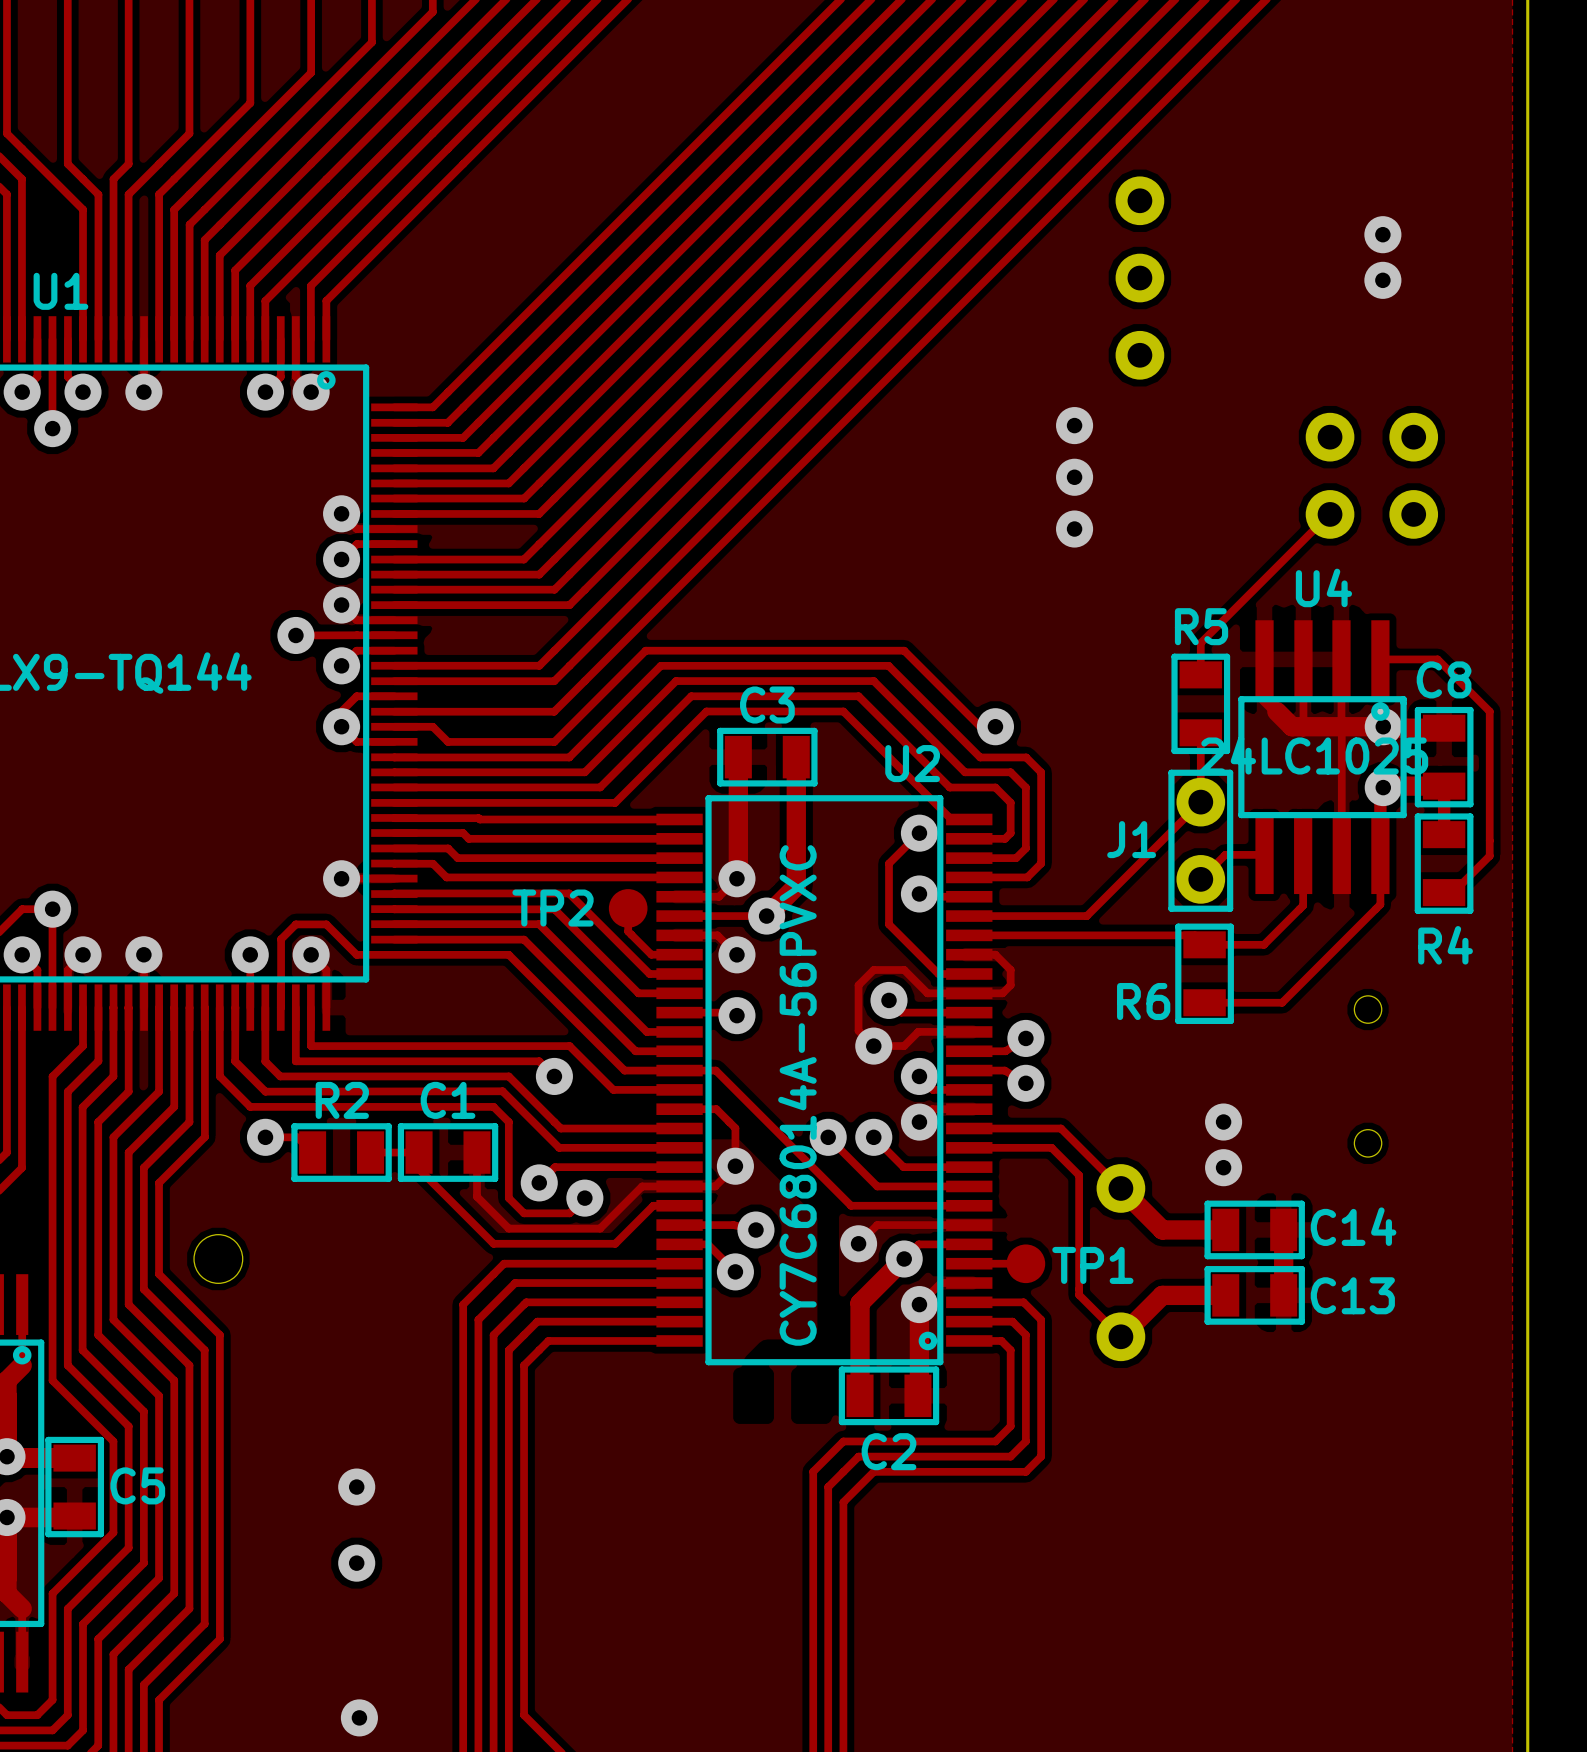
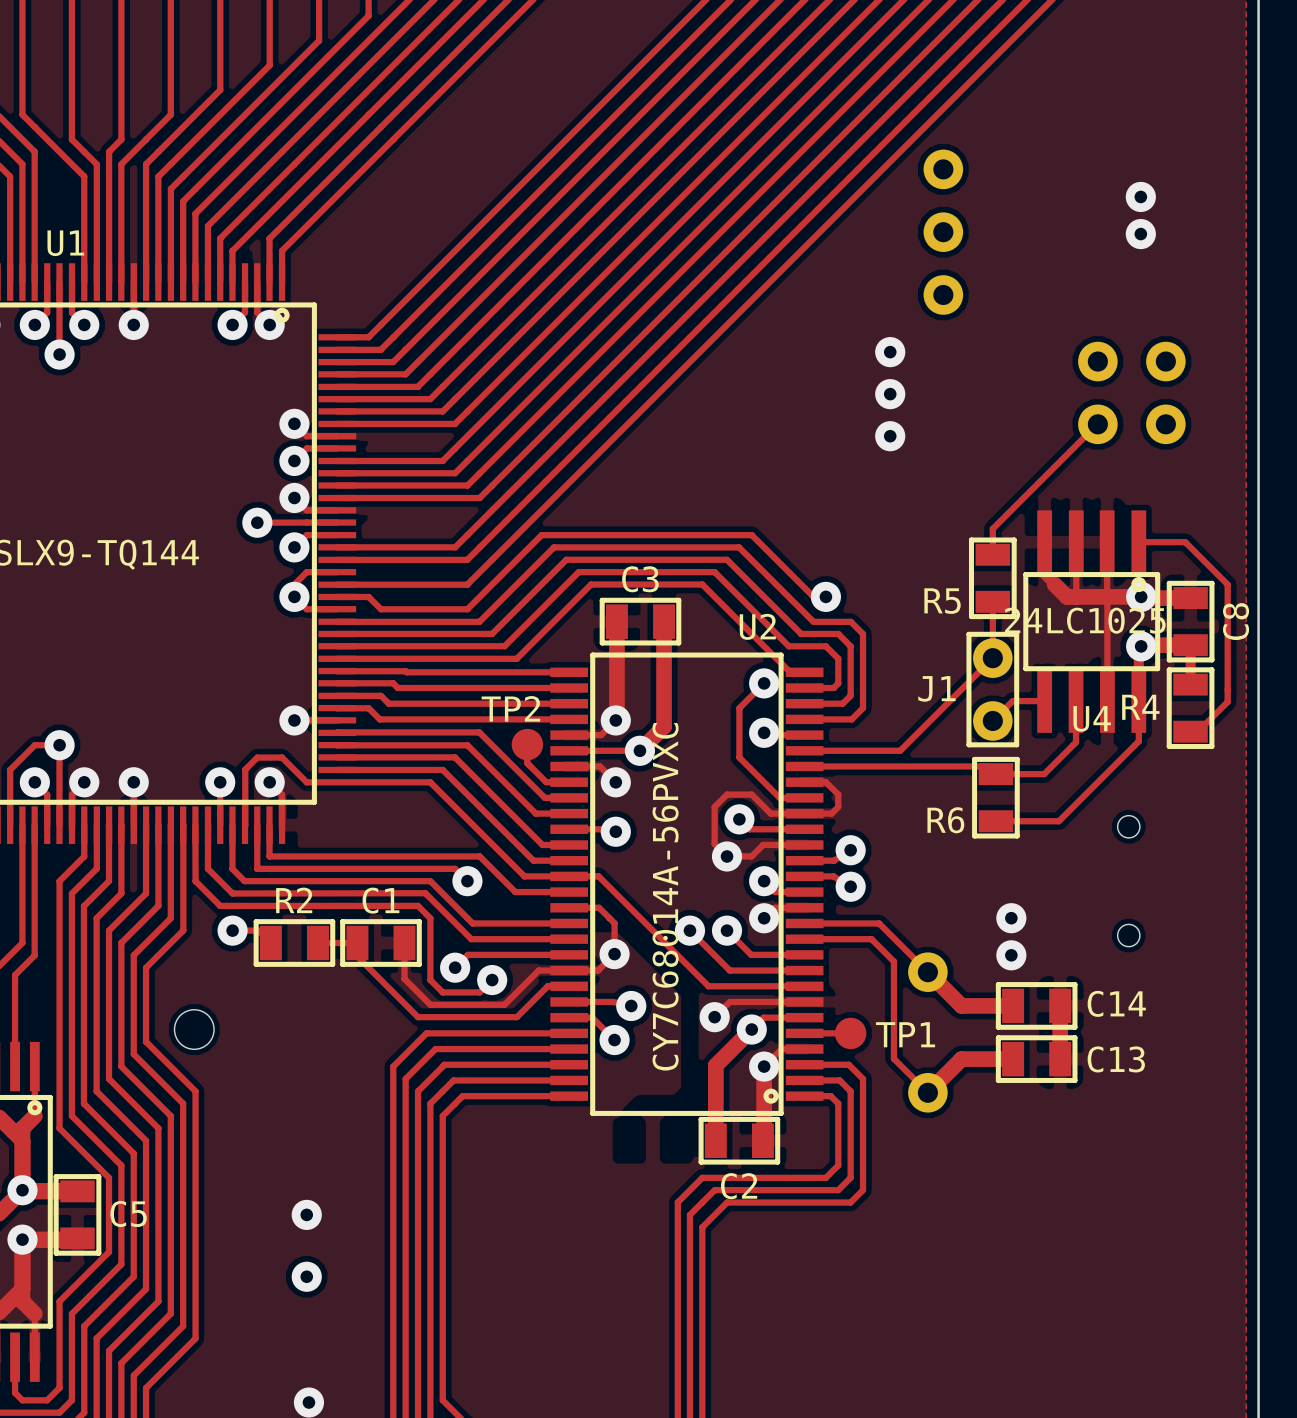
U4 name position: U4 (1323, 587) -> U4 (1092, 718)
R5 name position: R5 (1201, 626) -> R5 (942, 601)
C8 name rotation: 0° (1444, 679) -> 90° counterclockwise (1236, 621)
C8 name position: C8 (1444, 679) -> C8 (1236, 621)
TP2 name position: TP2 (553, 908) -> TP2 (510, 708)
R4 name position: R4 (1445, 945) -> R4 (1140, 707)

